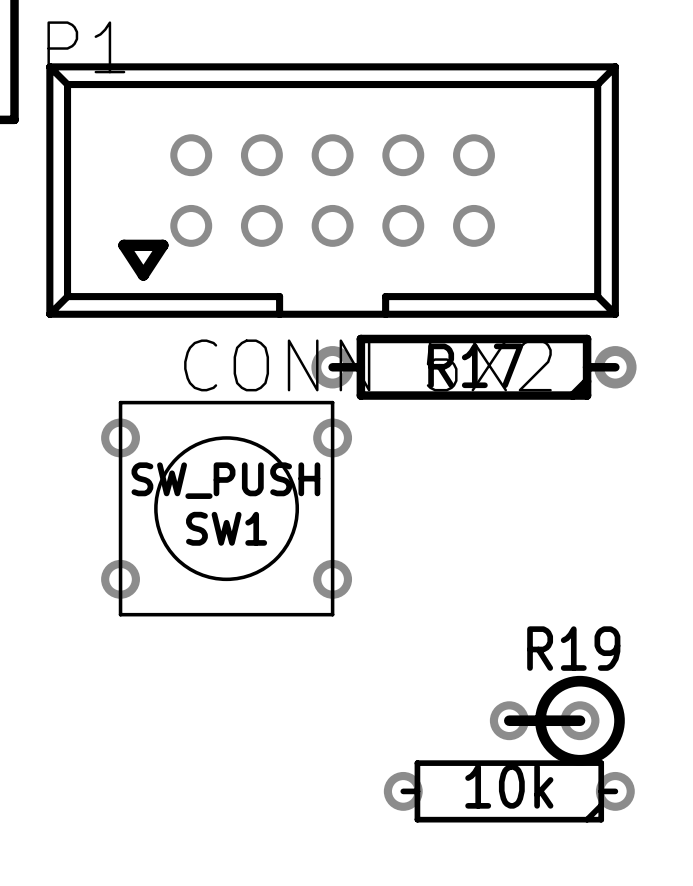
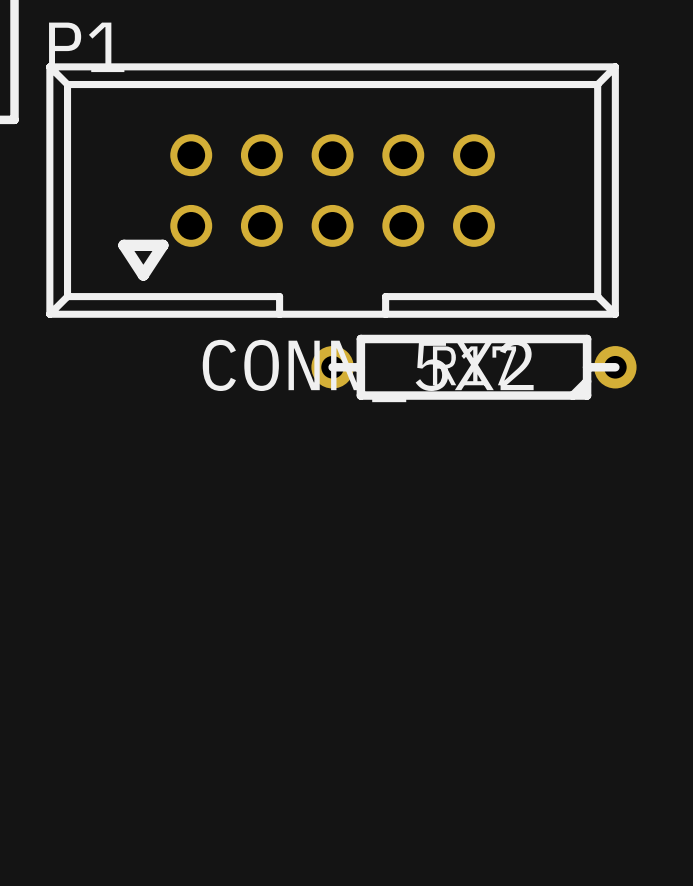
SW1: SW_PUSH (226, 508) -> none
R19: (557, 720) -> none
part: 10k (509, 791) -> none

